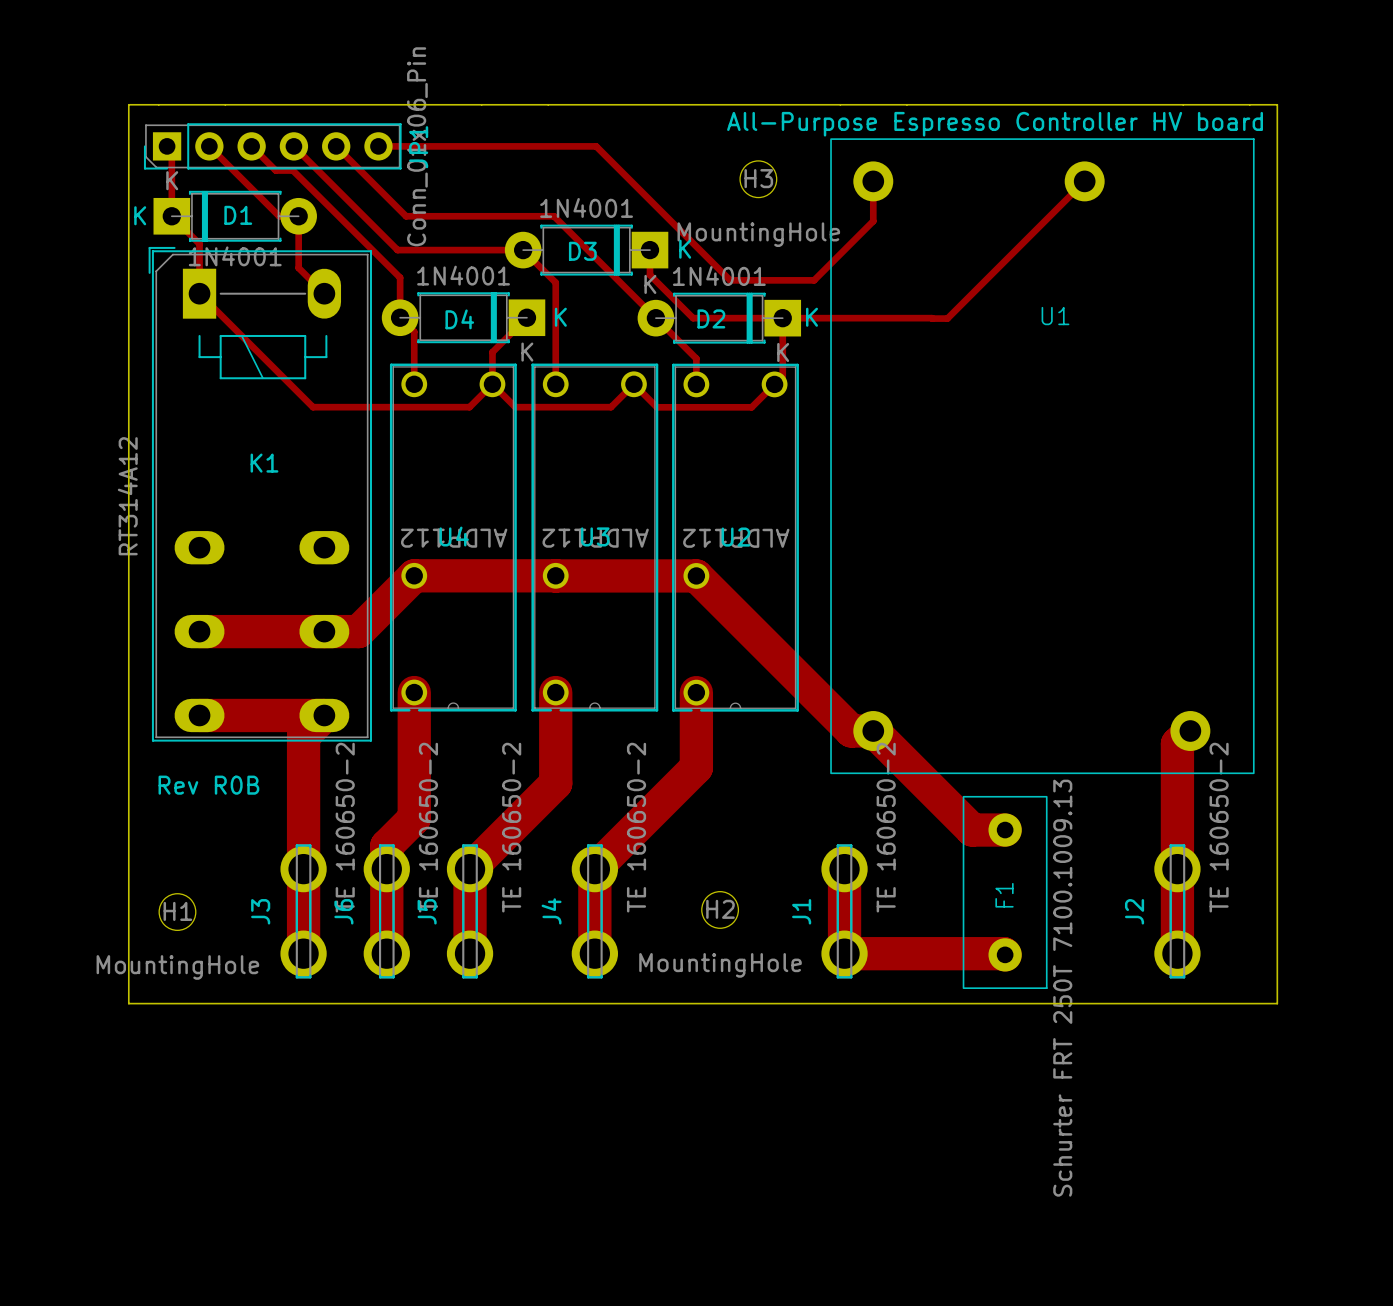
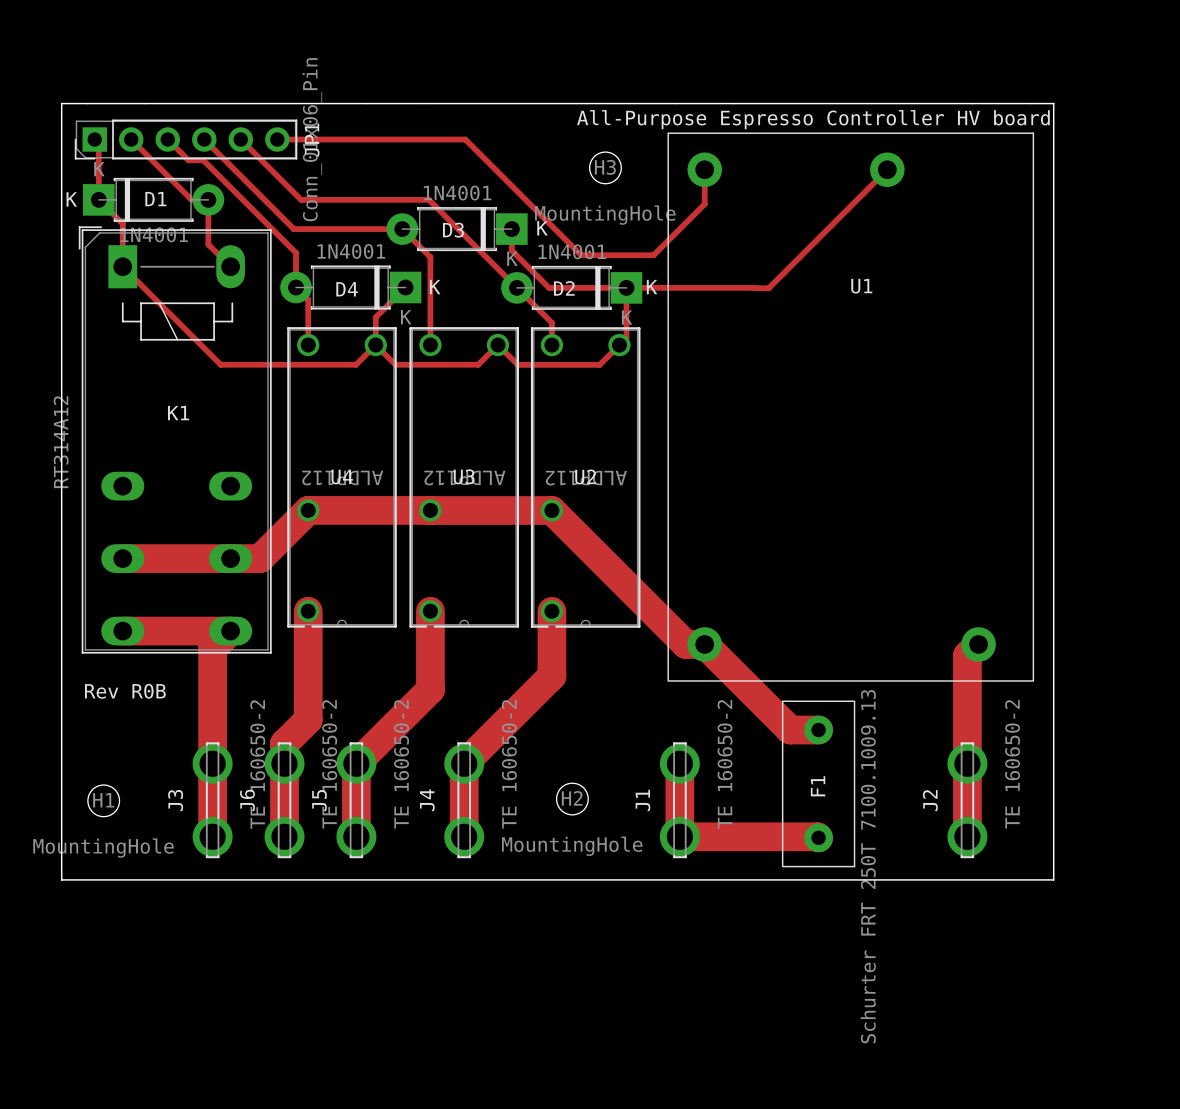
J3 value position: TE 160650-2 (345, 827) -> TE 160650-2 (257, 764)
J6 value position: TE 160650-2 (428, 827) -> TE 160650-2 (329, 764)
J5 value position: TE 160650-2 (511, 827) -> TE 160650-2 (401, 764)
J4 value position: TE 160650-2 (636, 827) -> TE 160650-2 (509, 764)
J1 value position: TE 160650-2 (886, 827) -> TE 160650-2 (725, 764)
J2 value position: TE 160650-2 (1219, 827) -> TE 160650-2 (1012, 764)

